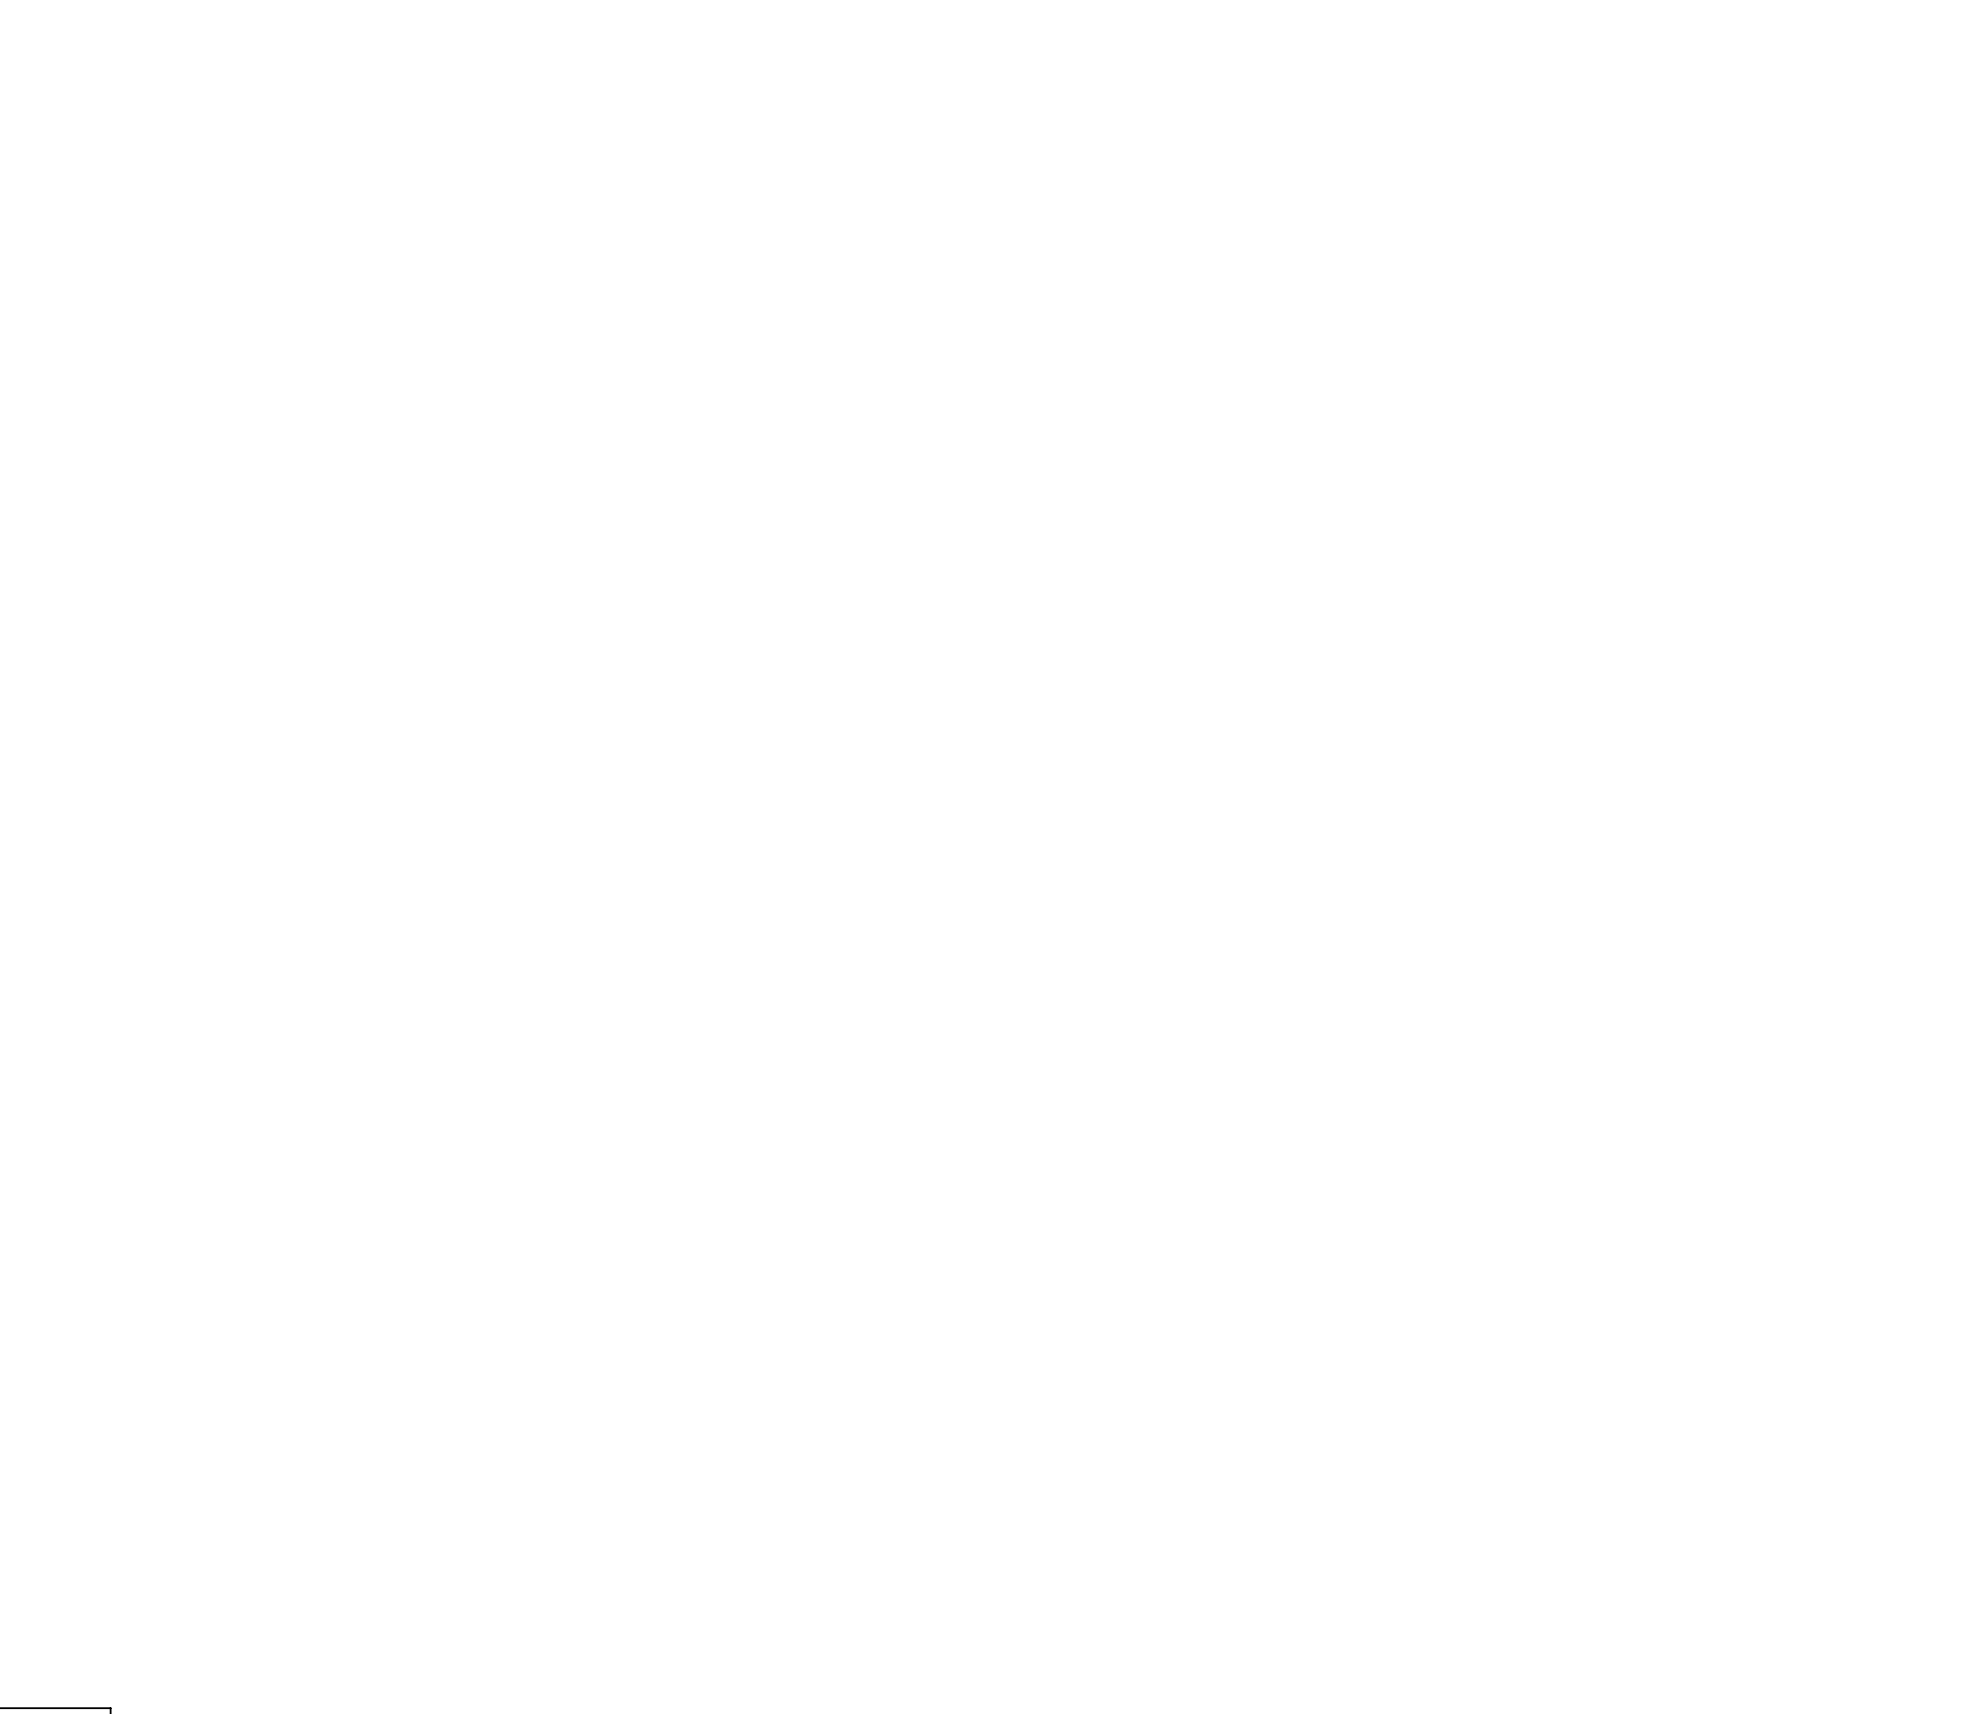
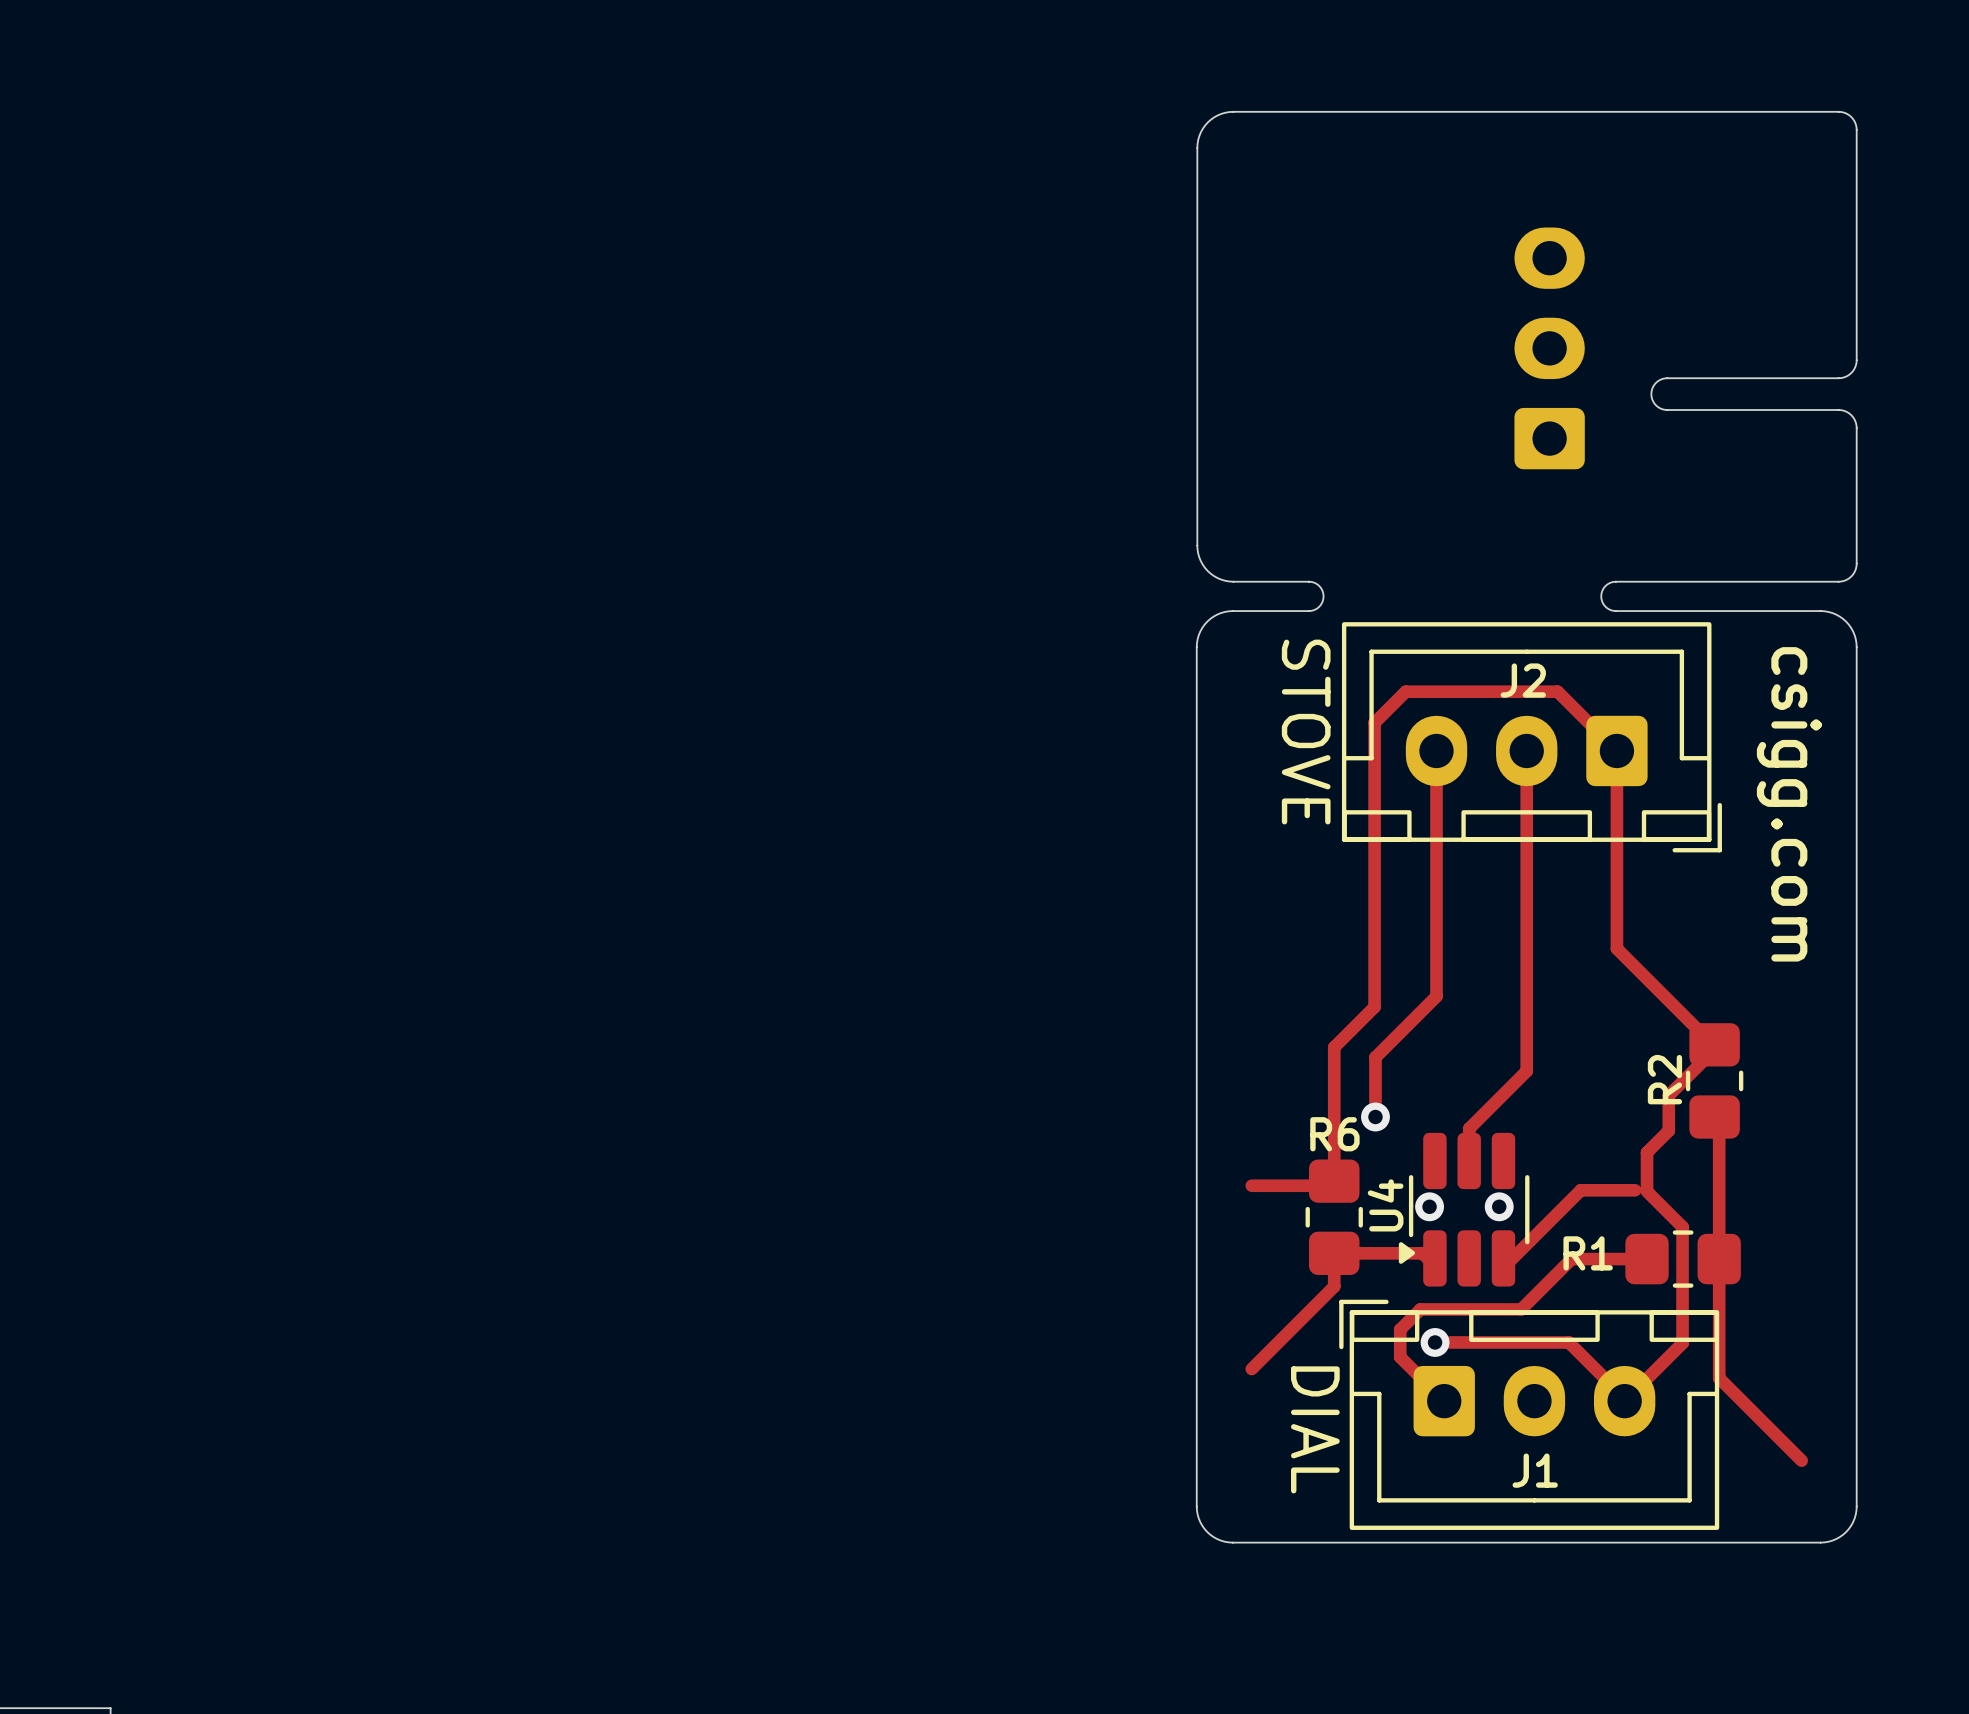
part: none -> (1549, 348)
board edge: none -> (1308, 581) (1310, 581) (1312, 582) (1317, 584) (1323, 592) (1322, 601) (1316, 608) (1309, 611) (1224, 611) (1207, 621) (1200, 631) (1196, 643) (1196, 1506) (1202, 1525) (1217, 1539) (1232, 1542) (1820, 1542) (1839, 1537) (1851, 1525) (1856, 1506) (1855, 639) (1851, 627) (1843, 618) (1824, 611) (1614, 610) (1605, 606) (1601, 596) (1605, 586) (1614, 581) (1838, 581) (1847, 579) (1854, 572) (1856, 563) (1856, 428) (1851, 415) (1838, 409) (1665, 409) (1654, 403) (1651, 394) (1654, 384) (1665, 378) (1838, 378) (1845, 376) (1852, 371) (1856, 360) (1856, 129) (1852, 118) (1845, 113) (1838, 111) (1233, 111) (1221, 113) (1210, 119) (1200, 132) (1197, 147) (1198, 553) (1207, 571) (1225, 580) (1309, 581)
text: none -> STOVE (1306, 732)
J2: none -> (1531, 737)
track: none -> (1436, 750) (1436, 996) (1375, 1057) (1375, 1117)
track: none -> (1526, 750) (1526, 1071) (1469, 1128) (1469, 1170)
text: none -> csigg.com (1789, 804)
track: none -> (1714, 1044) (1616, 948) (1616, 750) (1557, 691) (1405, 691) (1374, 722) (1374, 1007) (1334, 1047) (1334, 1181) (1329, 1185) (1251, 1185)
track: none -> (1715, 1048) (1668, 1095) (1668, 1130) (1647, 1152) (1647, 1190)
R2: none -> (1714, 1080)
via: none -> (1375, 1117)
track: none -> (1719, 1117) (1719, 1378) (1801, 1460)
track: none -> (1635, 1190) (1580, 1190) (1503, 1267)
track: none -> (1647, 1191) (1682, 1226) (1682, 1343) (1624, 1401)
via: none -> (1429, 1206)
via: none -> (1499, 1206)
U4: none -> (1464, 1209)
R6: none -> (1334, 1217)
track: none -> (1334, 1253) (1334, 1286) (1251, 1369)
track: none -> (1343, 1253) (1422, 1253) (1434, 1265)
track: none -> (1647, 1259) (1571, 1259) (1521, 1309) (1420, 1309) (1400, 1329) (1400, 1357) (1444, 1401)
R1: none -> (1683, 1259)
via: none -> (1435, 1342)
track: none -> (1449, 1342) (1568, 1342) (1624, 1398)
J1: none -> (1529, 1414)
text: none -> DIAL (1315, 1429)

